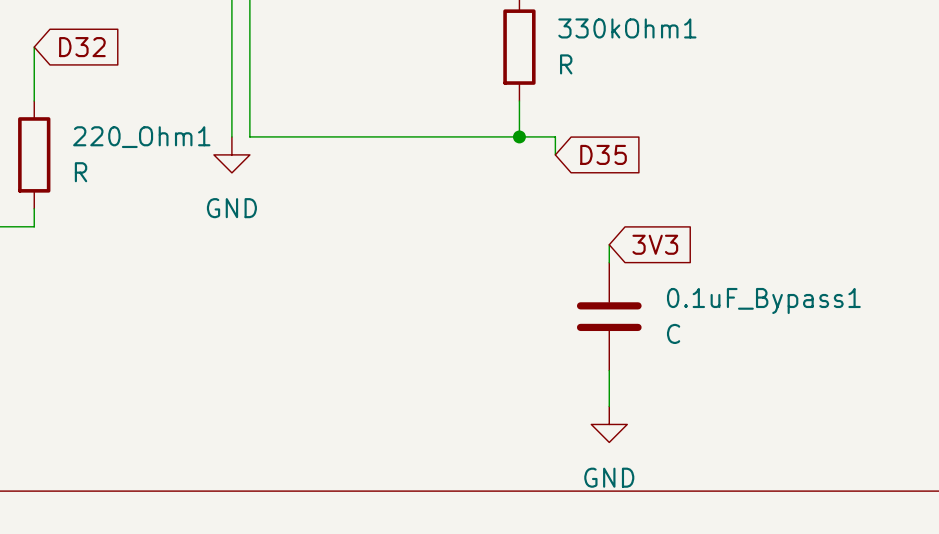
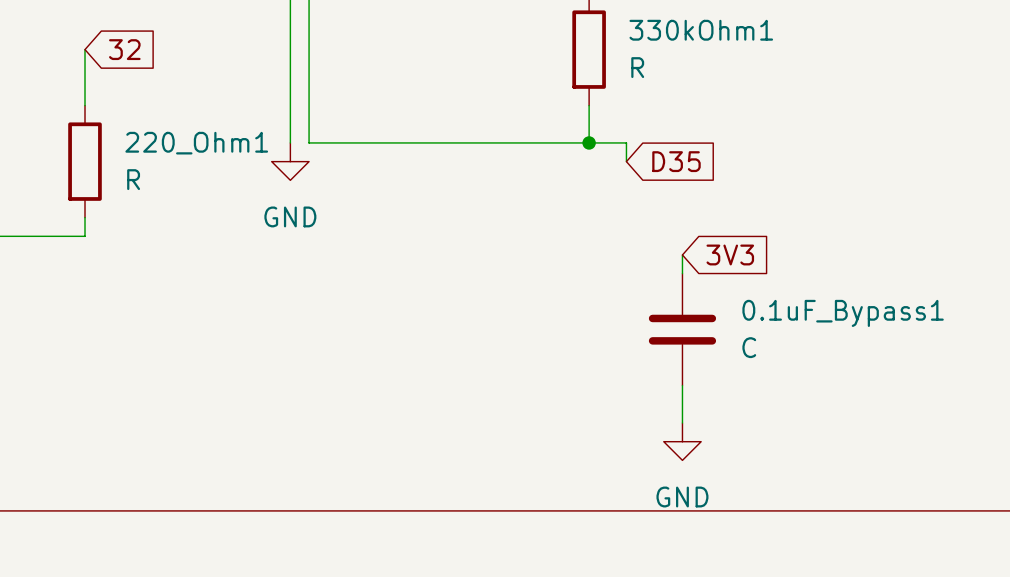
global label: D32 (82, 47) -> 32 (124, 49)

